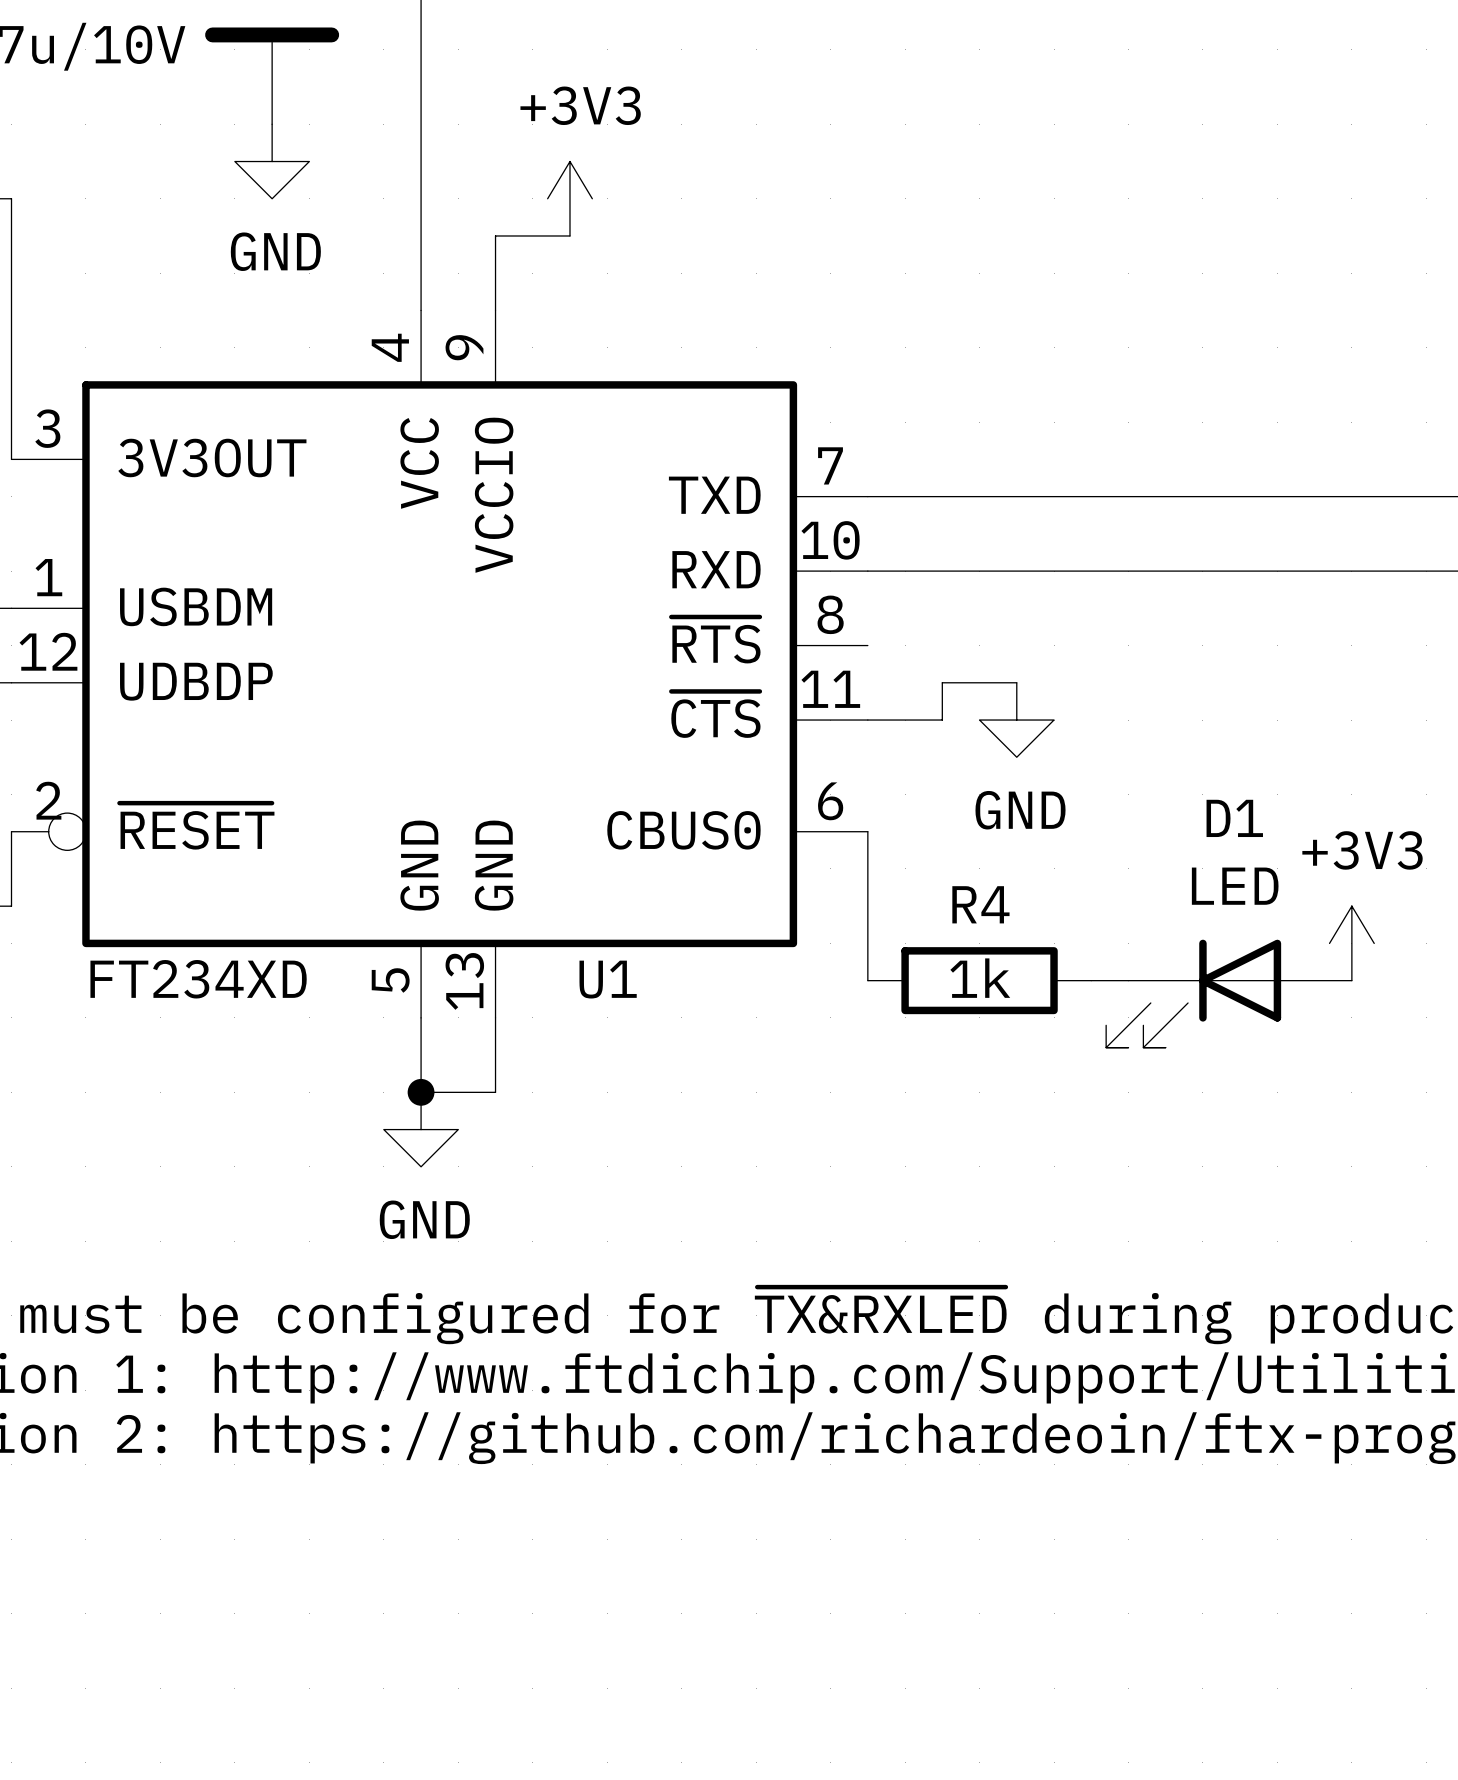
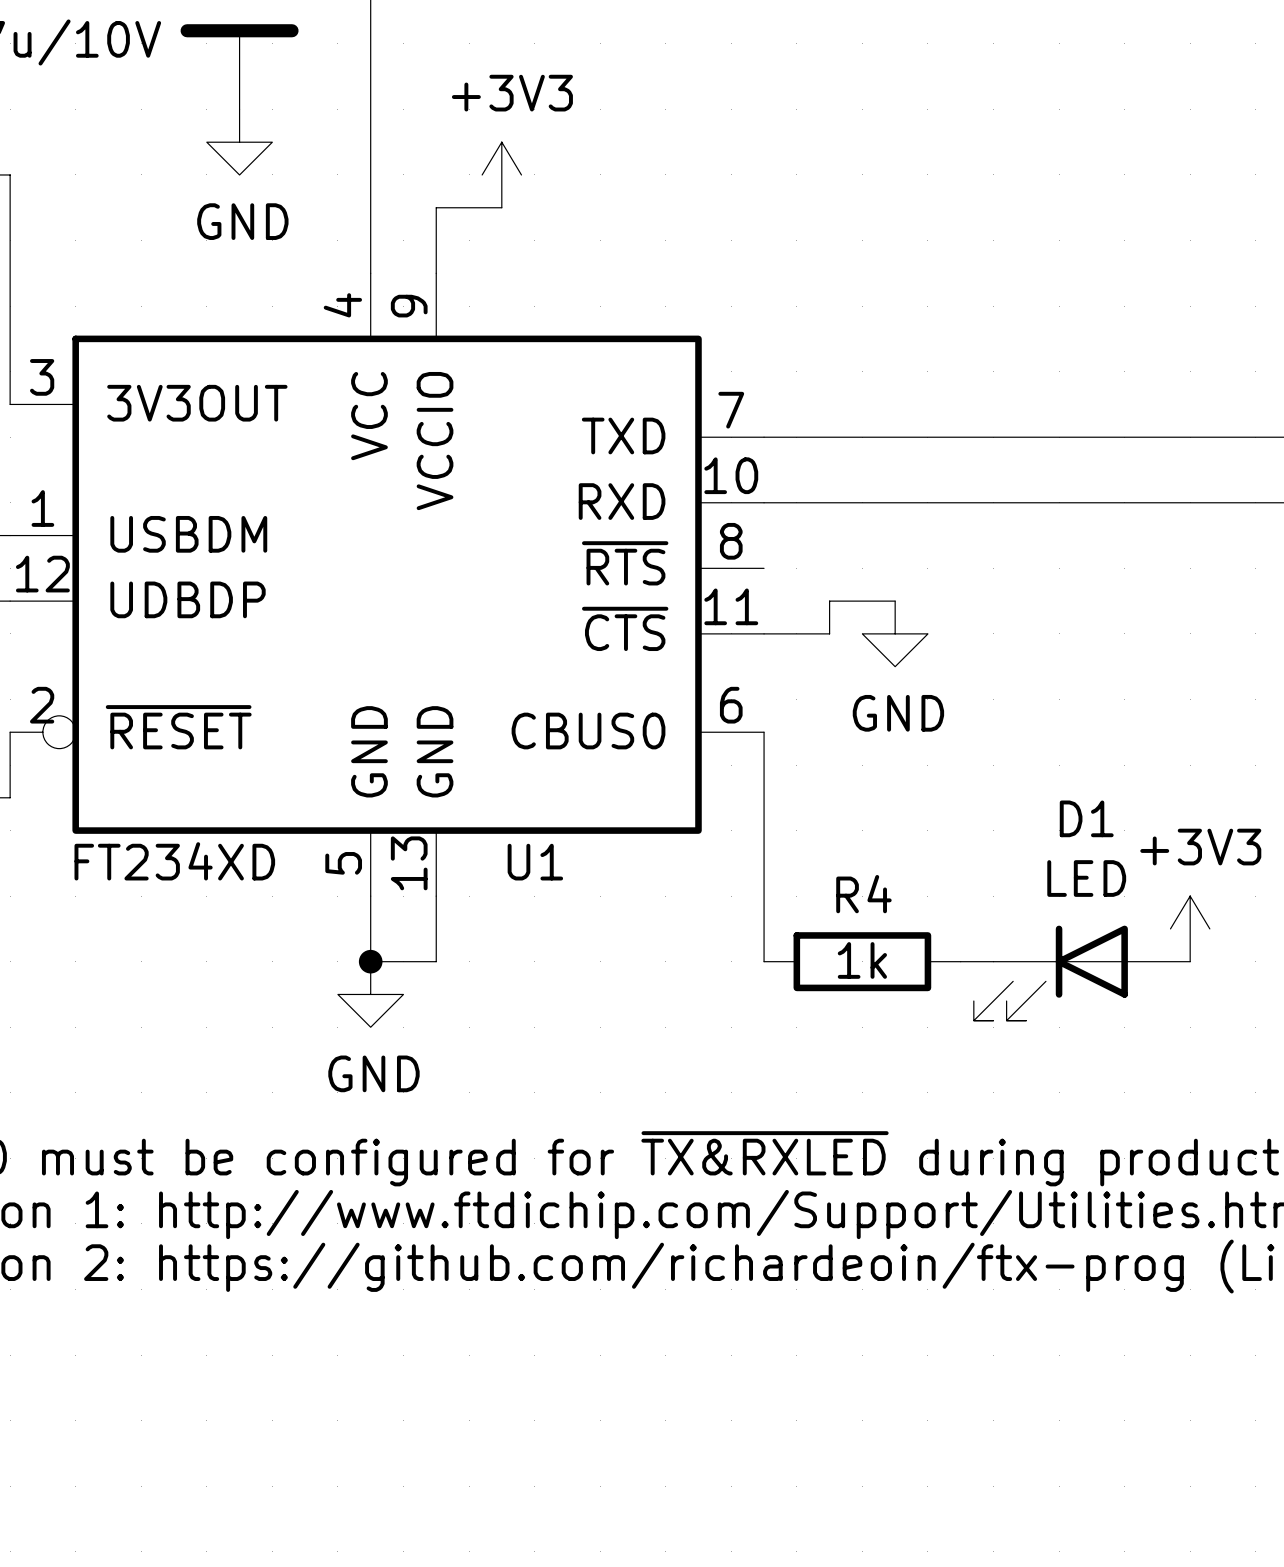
power symbol position: +3V3 (1351, 943) -> +3V3 (1190, 928)
wire: none -> (764, 863) (764, 961)
R4 position: (979, 980) -> (862, 961)
wire: (1091, 980) (1128, 980) -> (960, 961) (993, 961)
D1 position: (1229, 993) -> (1082, 973)

